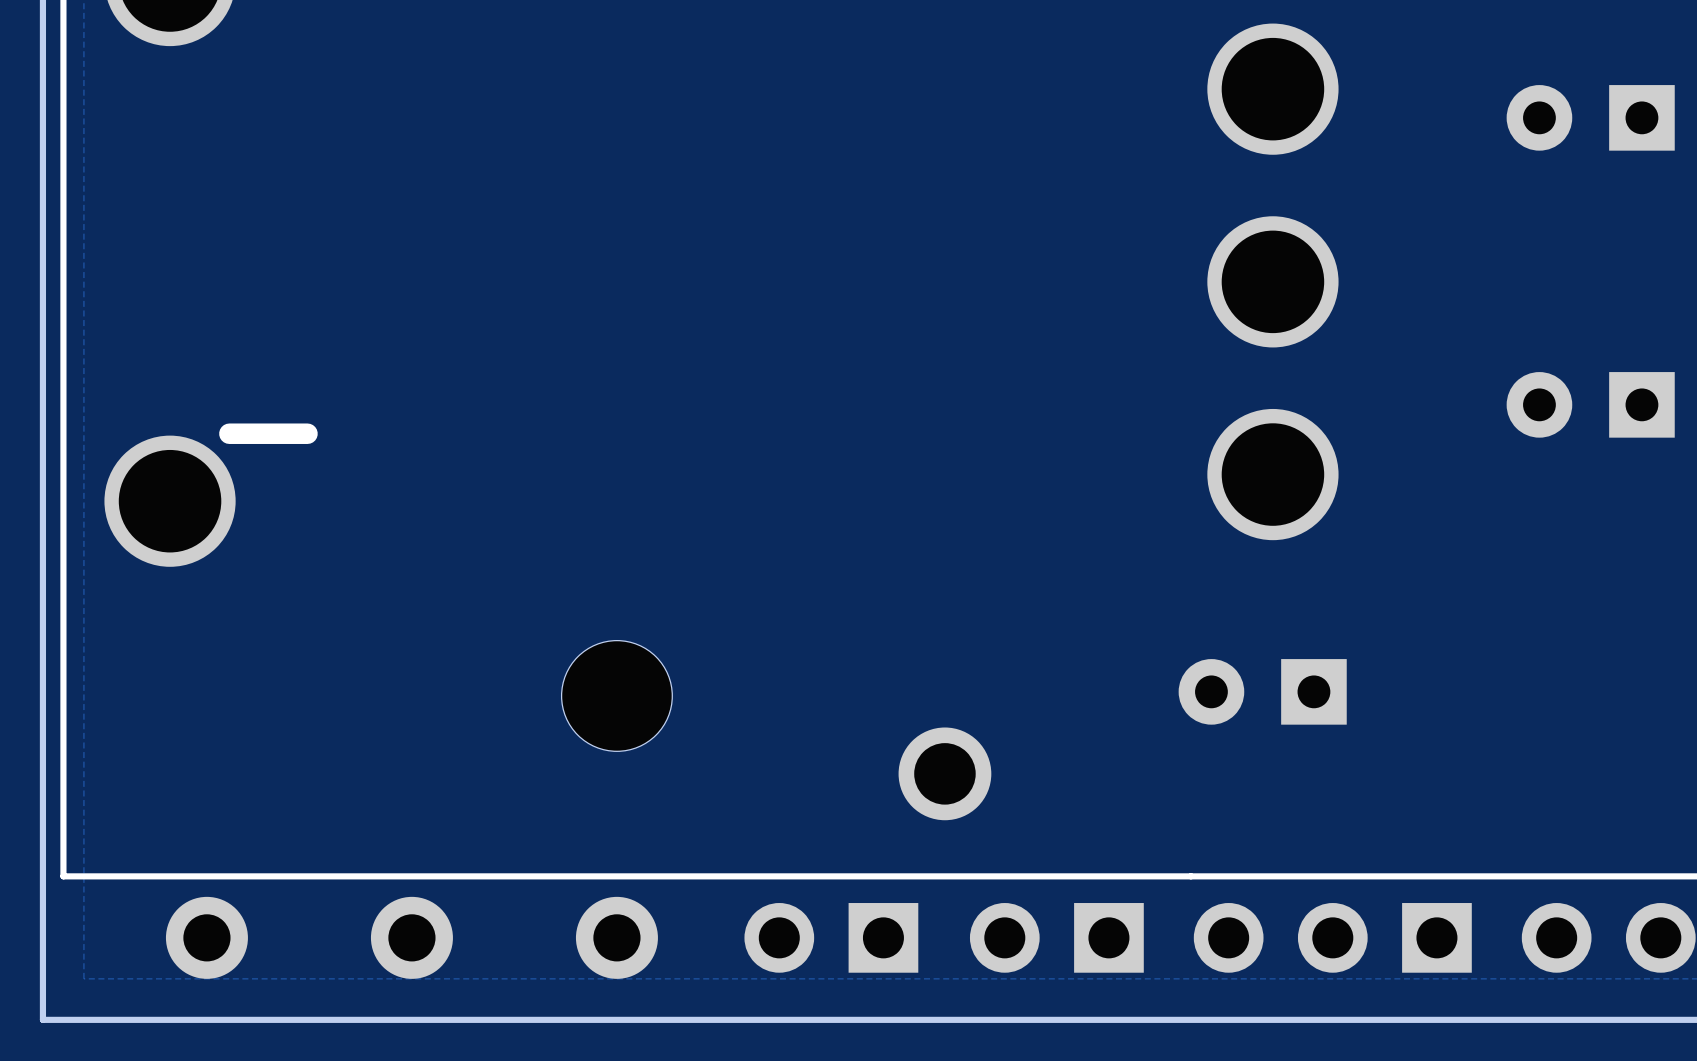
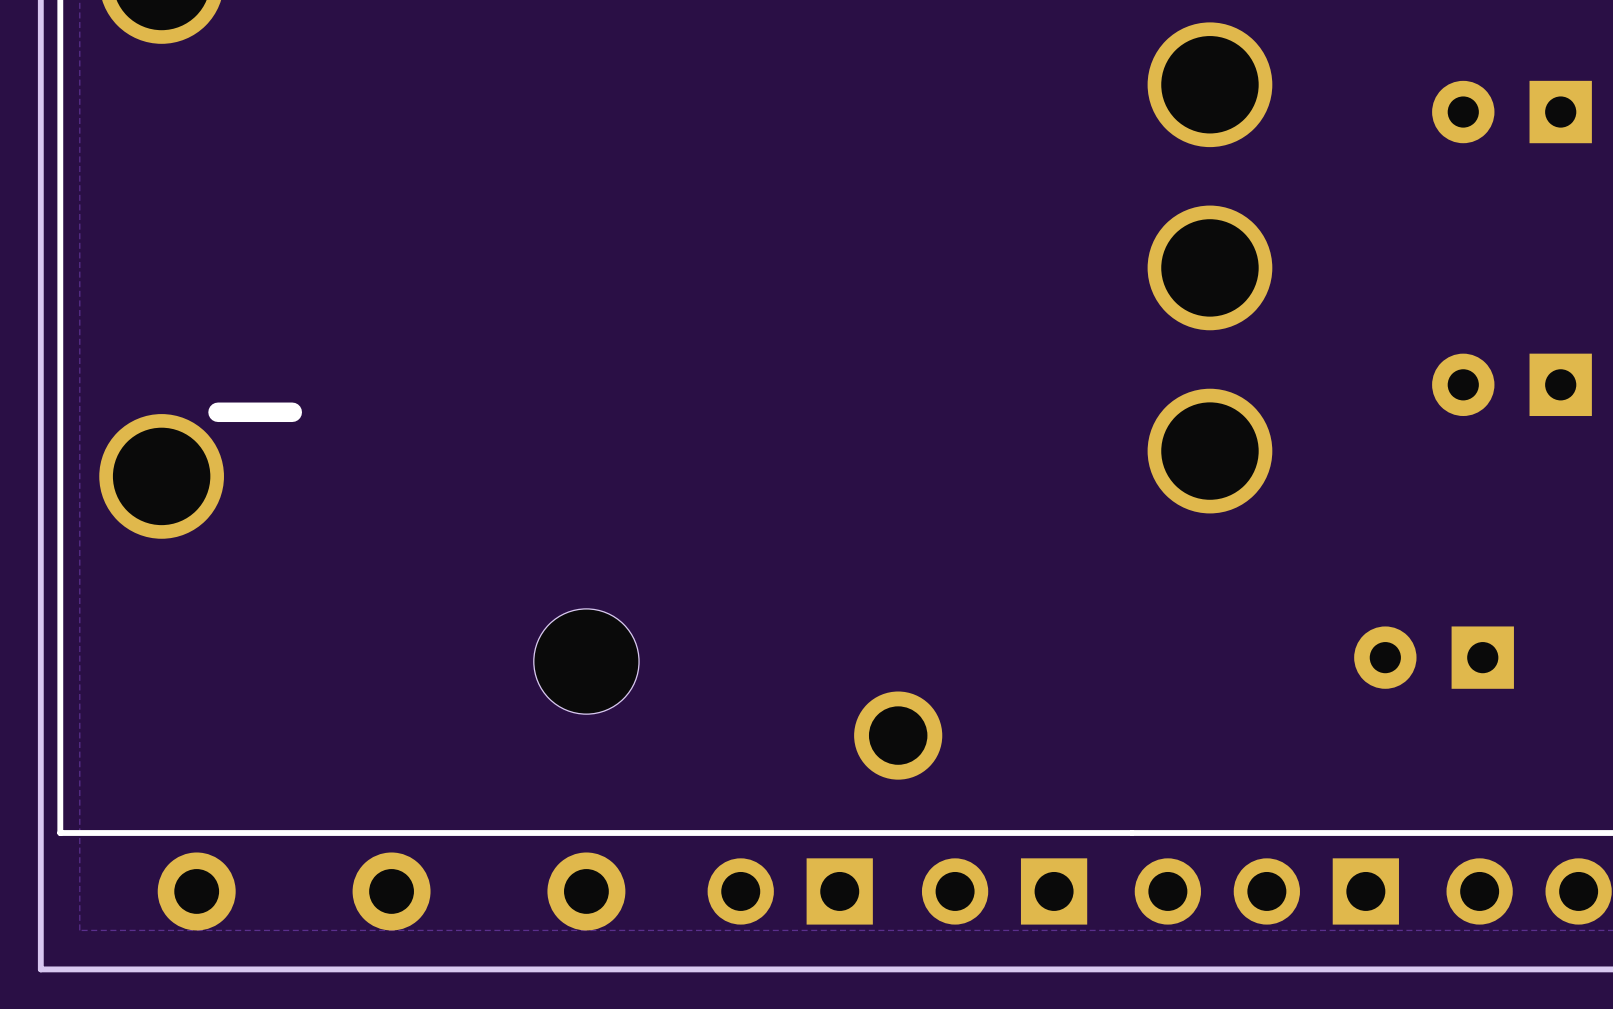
part position: (1262, 691) -> (1434, 657)

